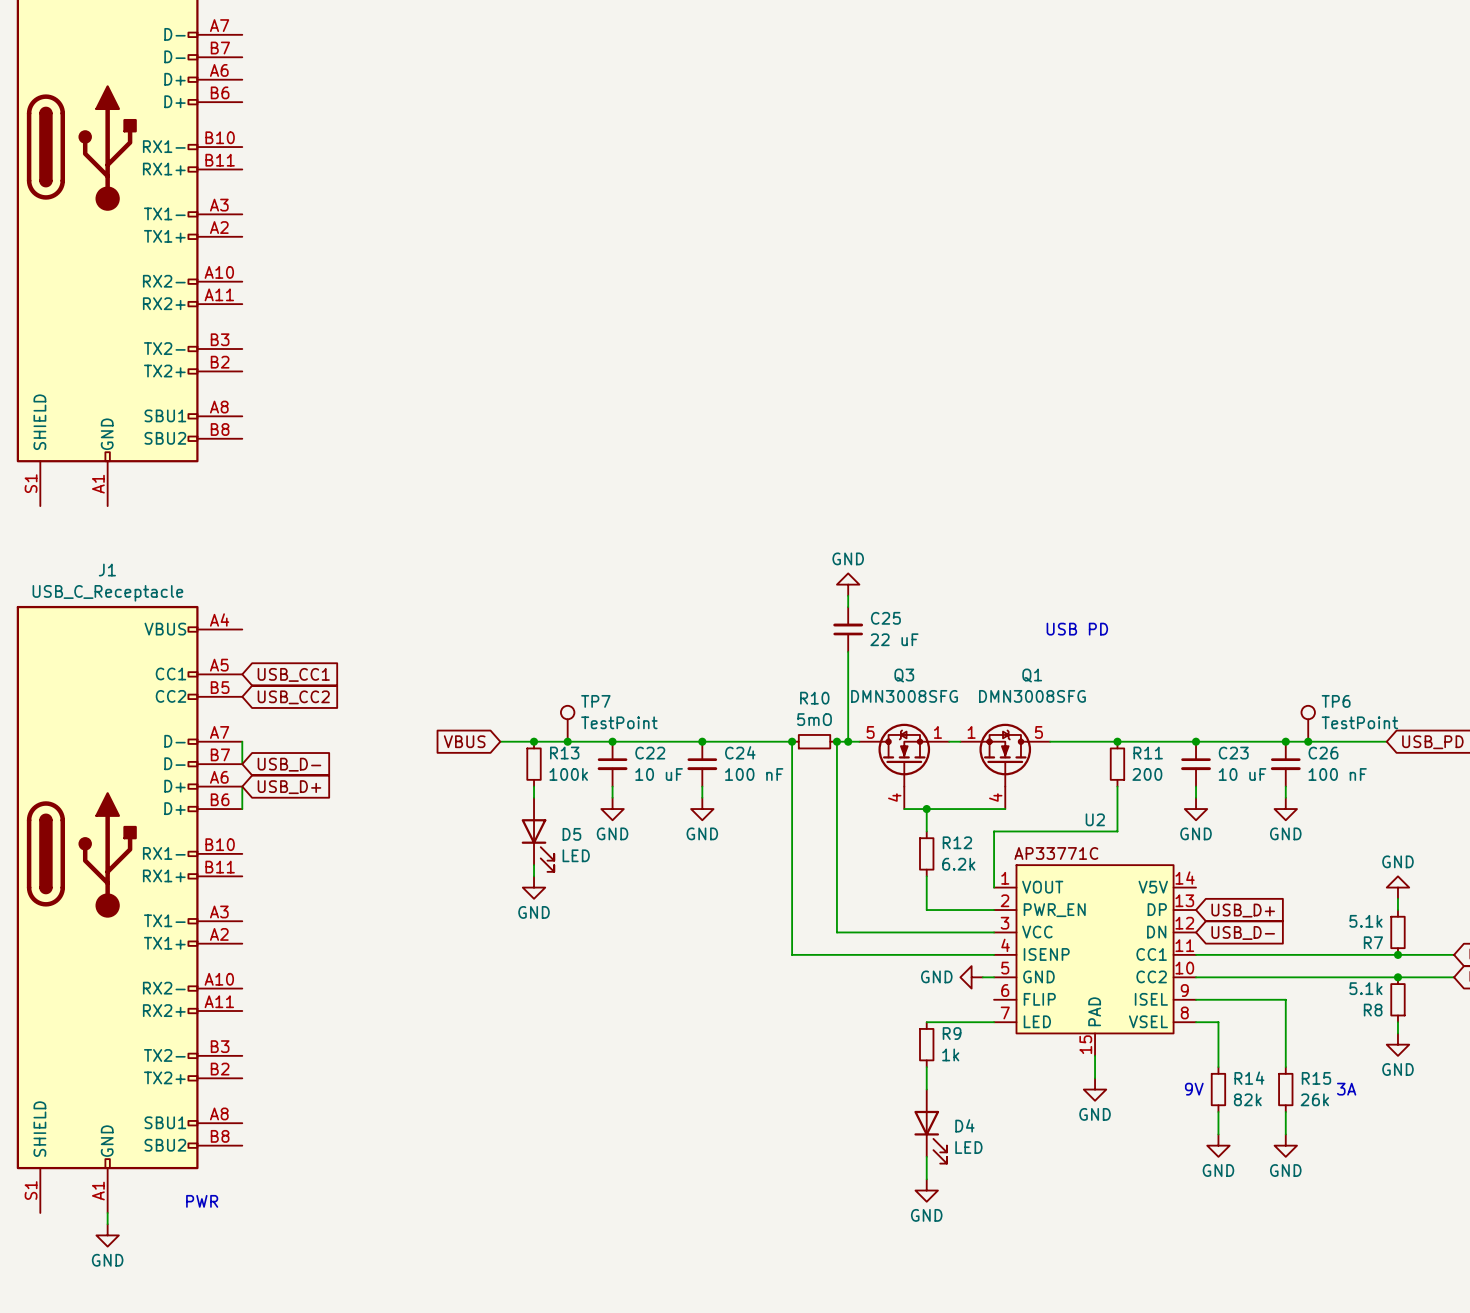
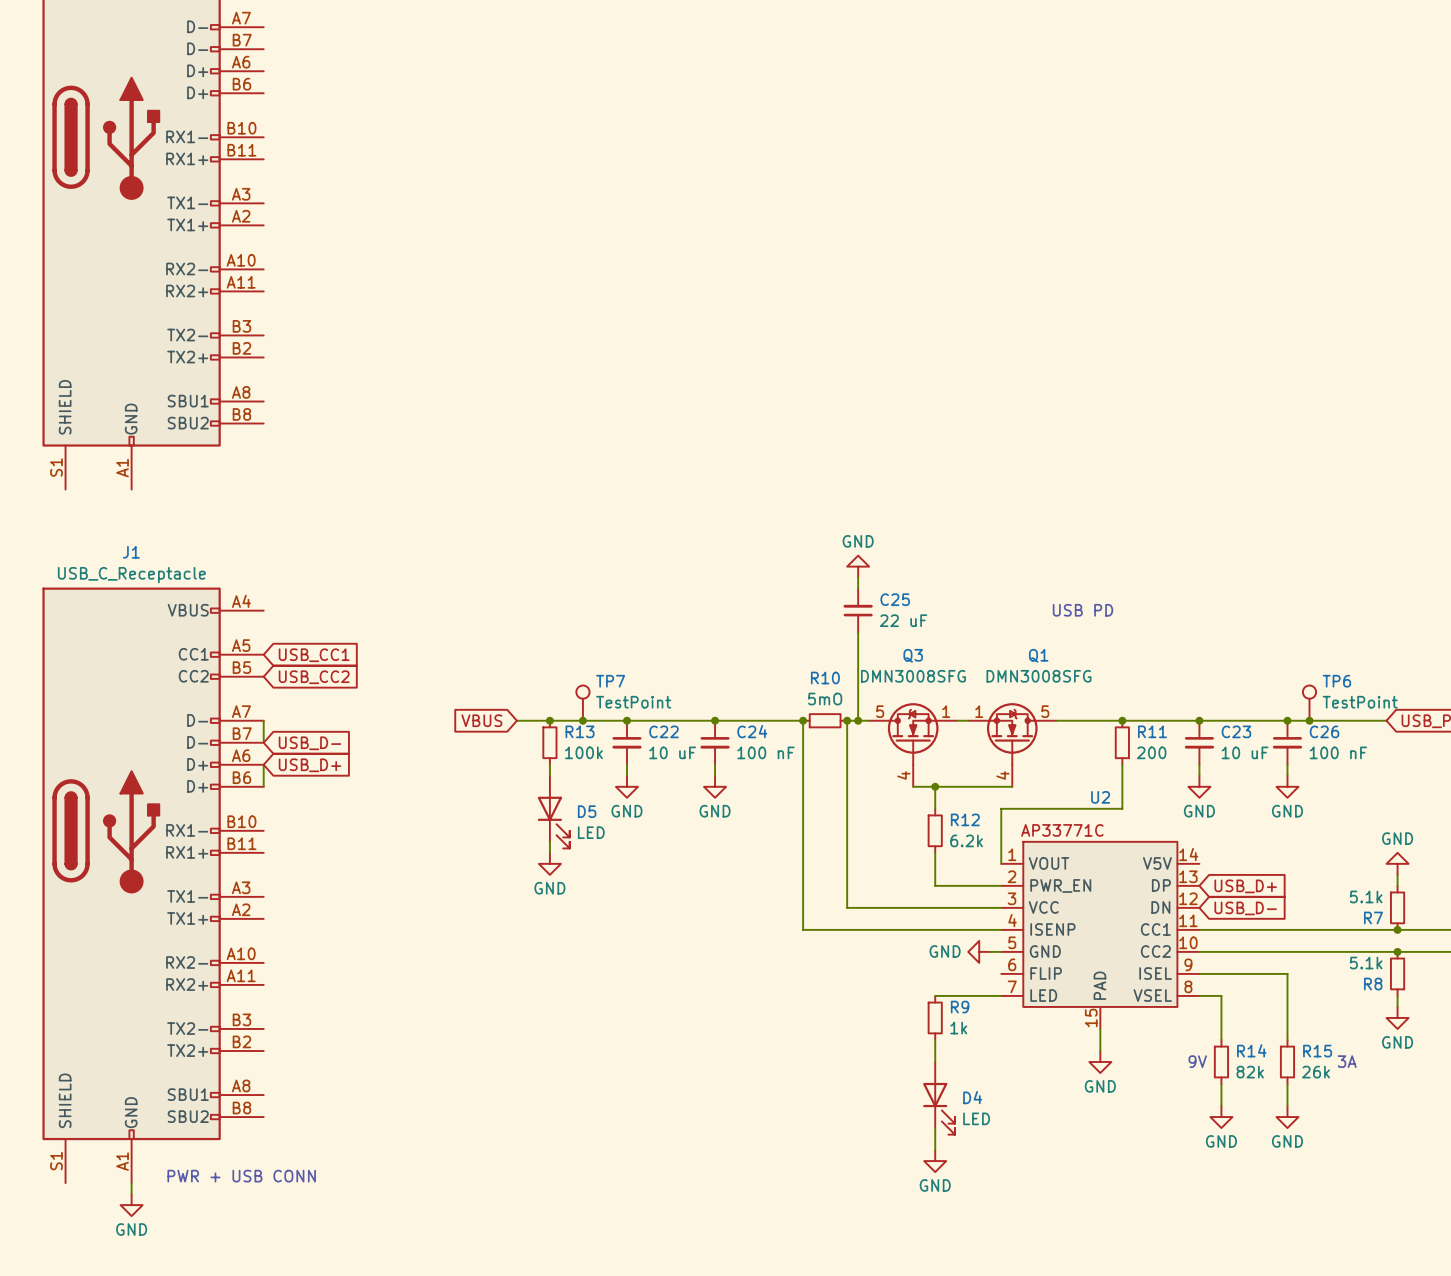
text: PWR (202, 1201) -> none
text: none -> PWR + USB CONN (241, 1176)

